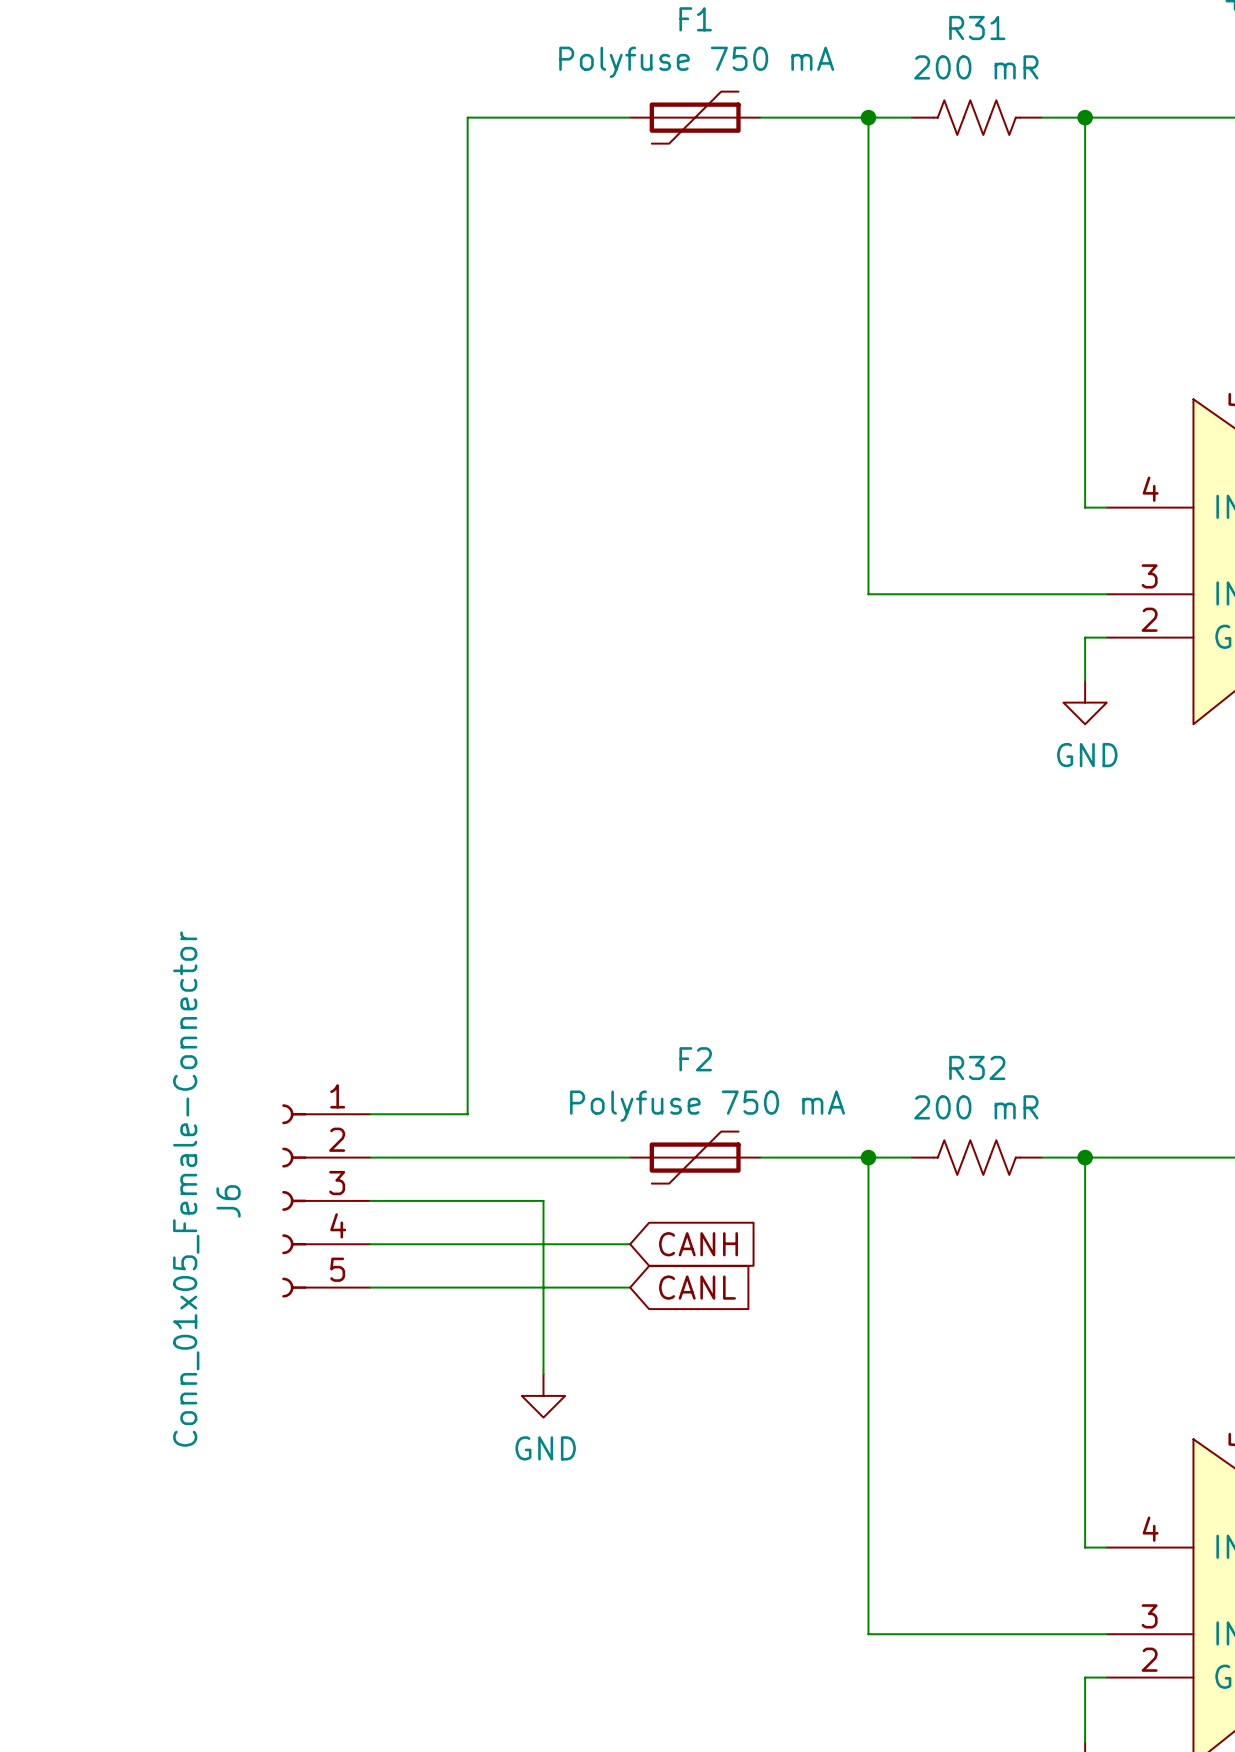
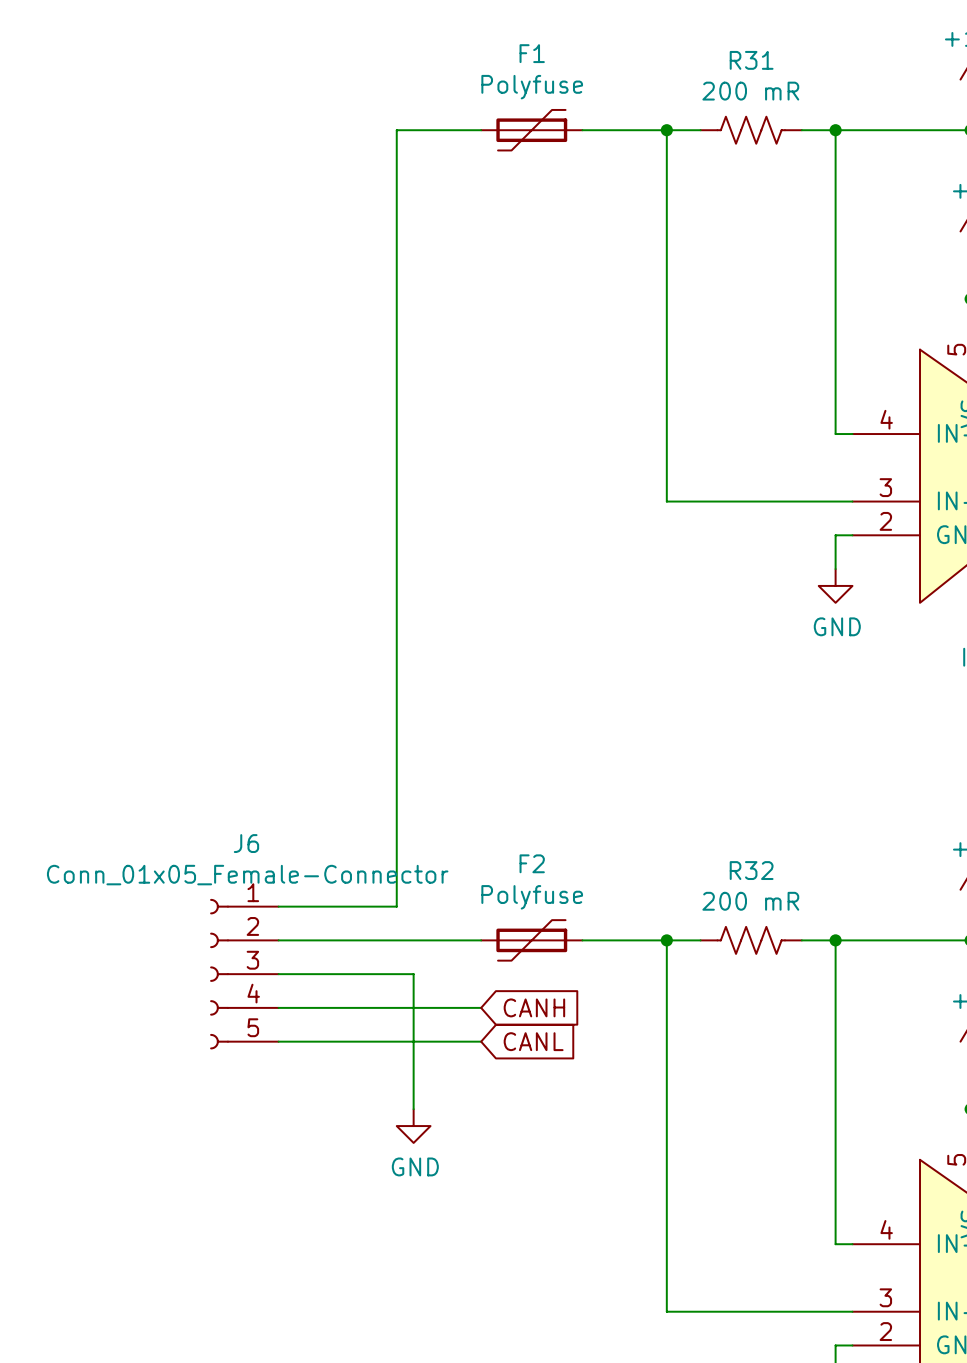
F1 value: Polyfuse 750 mA (696, 62) -> Polyfuse (532, 87)
wire: (521, 117) (467, 117) (467, 1114) -> (396, 130) (396, 906) (354, 906)
F2 value: Polyfuse 750 mA (707, 1106) -> Polyfuse (532, 897)
J6 value rotation: 0° (186, 1189) -> 90° clockwise (247, 875)
J6 name rotation: 0° (228, 1201) -> 90° clockwise (246, 843)
J6 name position: J6 (228, 1201) -> J6 (246, 843)

